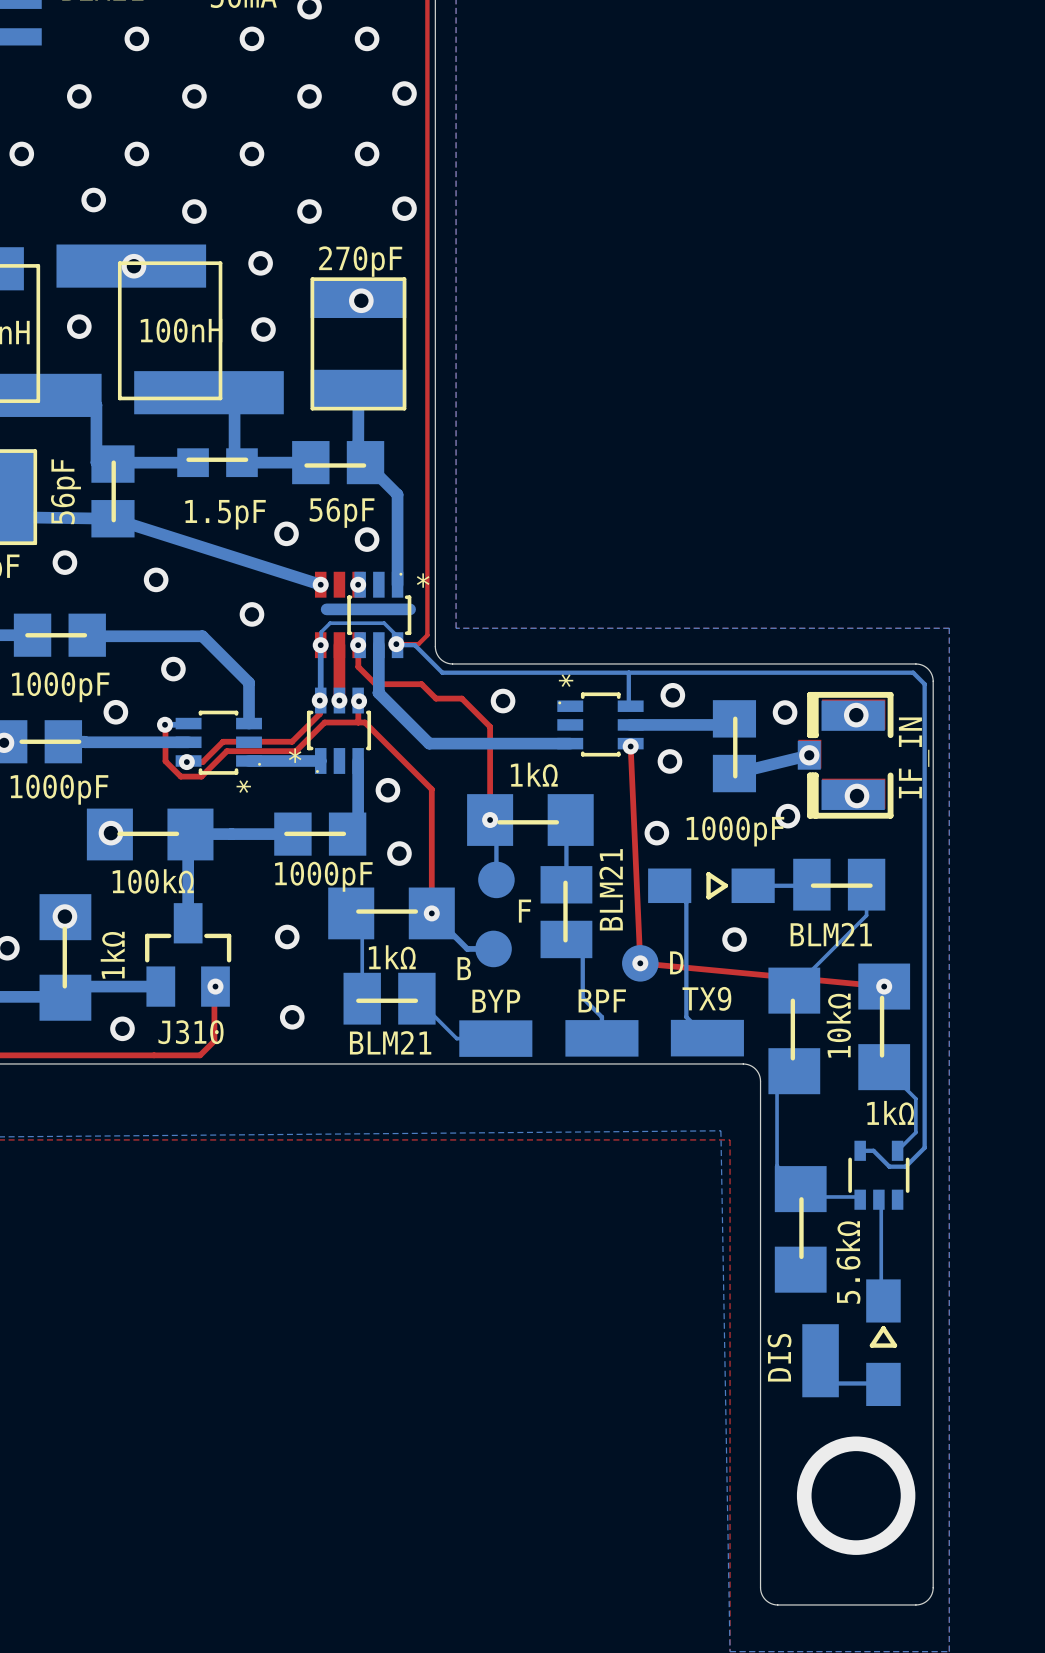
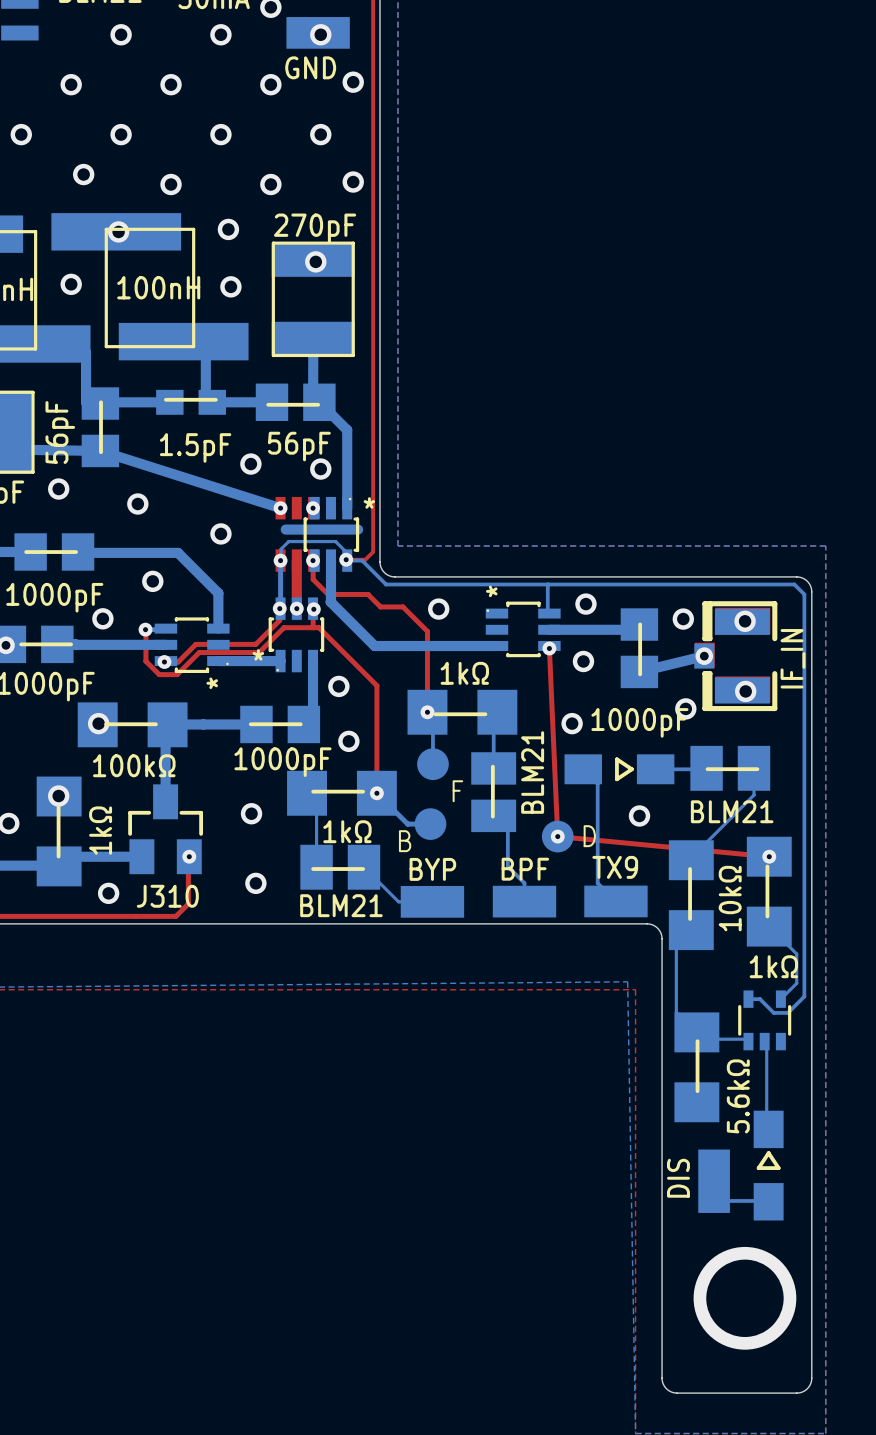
GND: none -> (318, 32)

